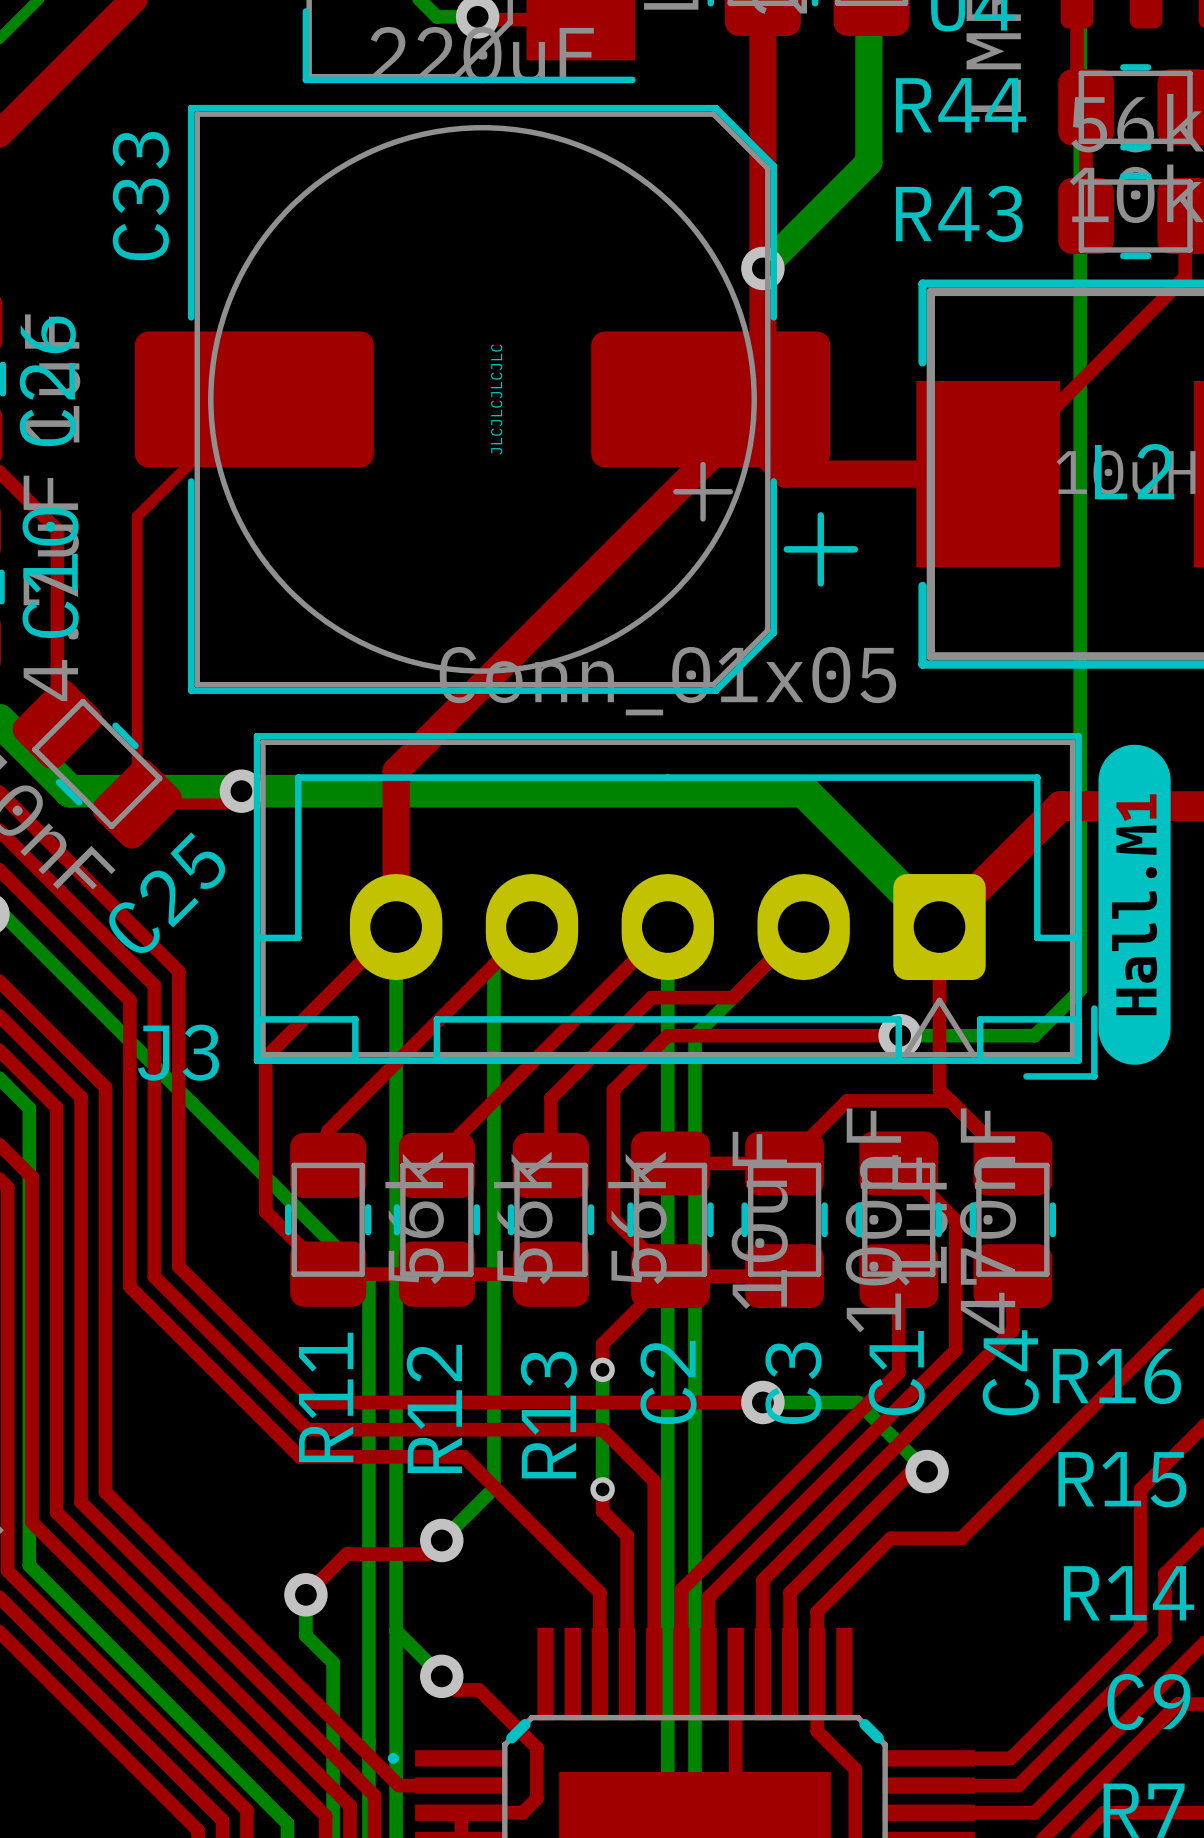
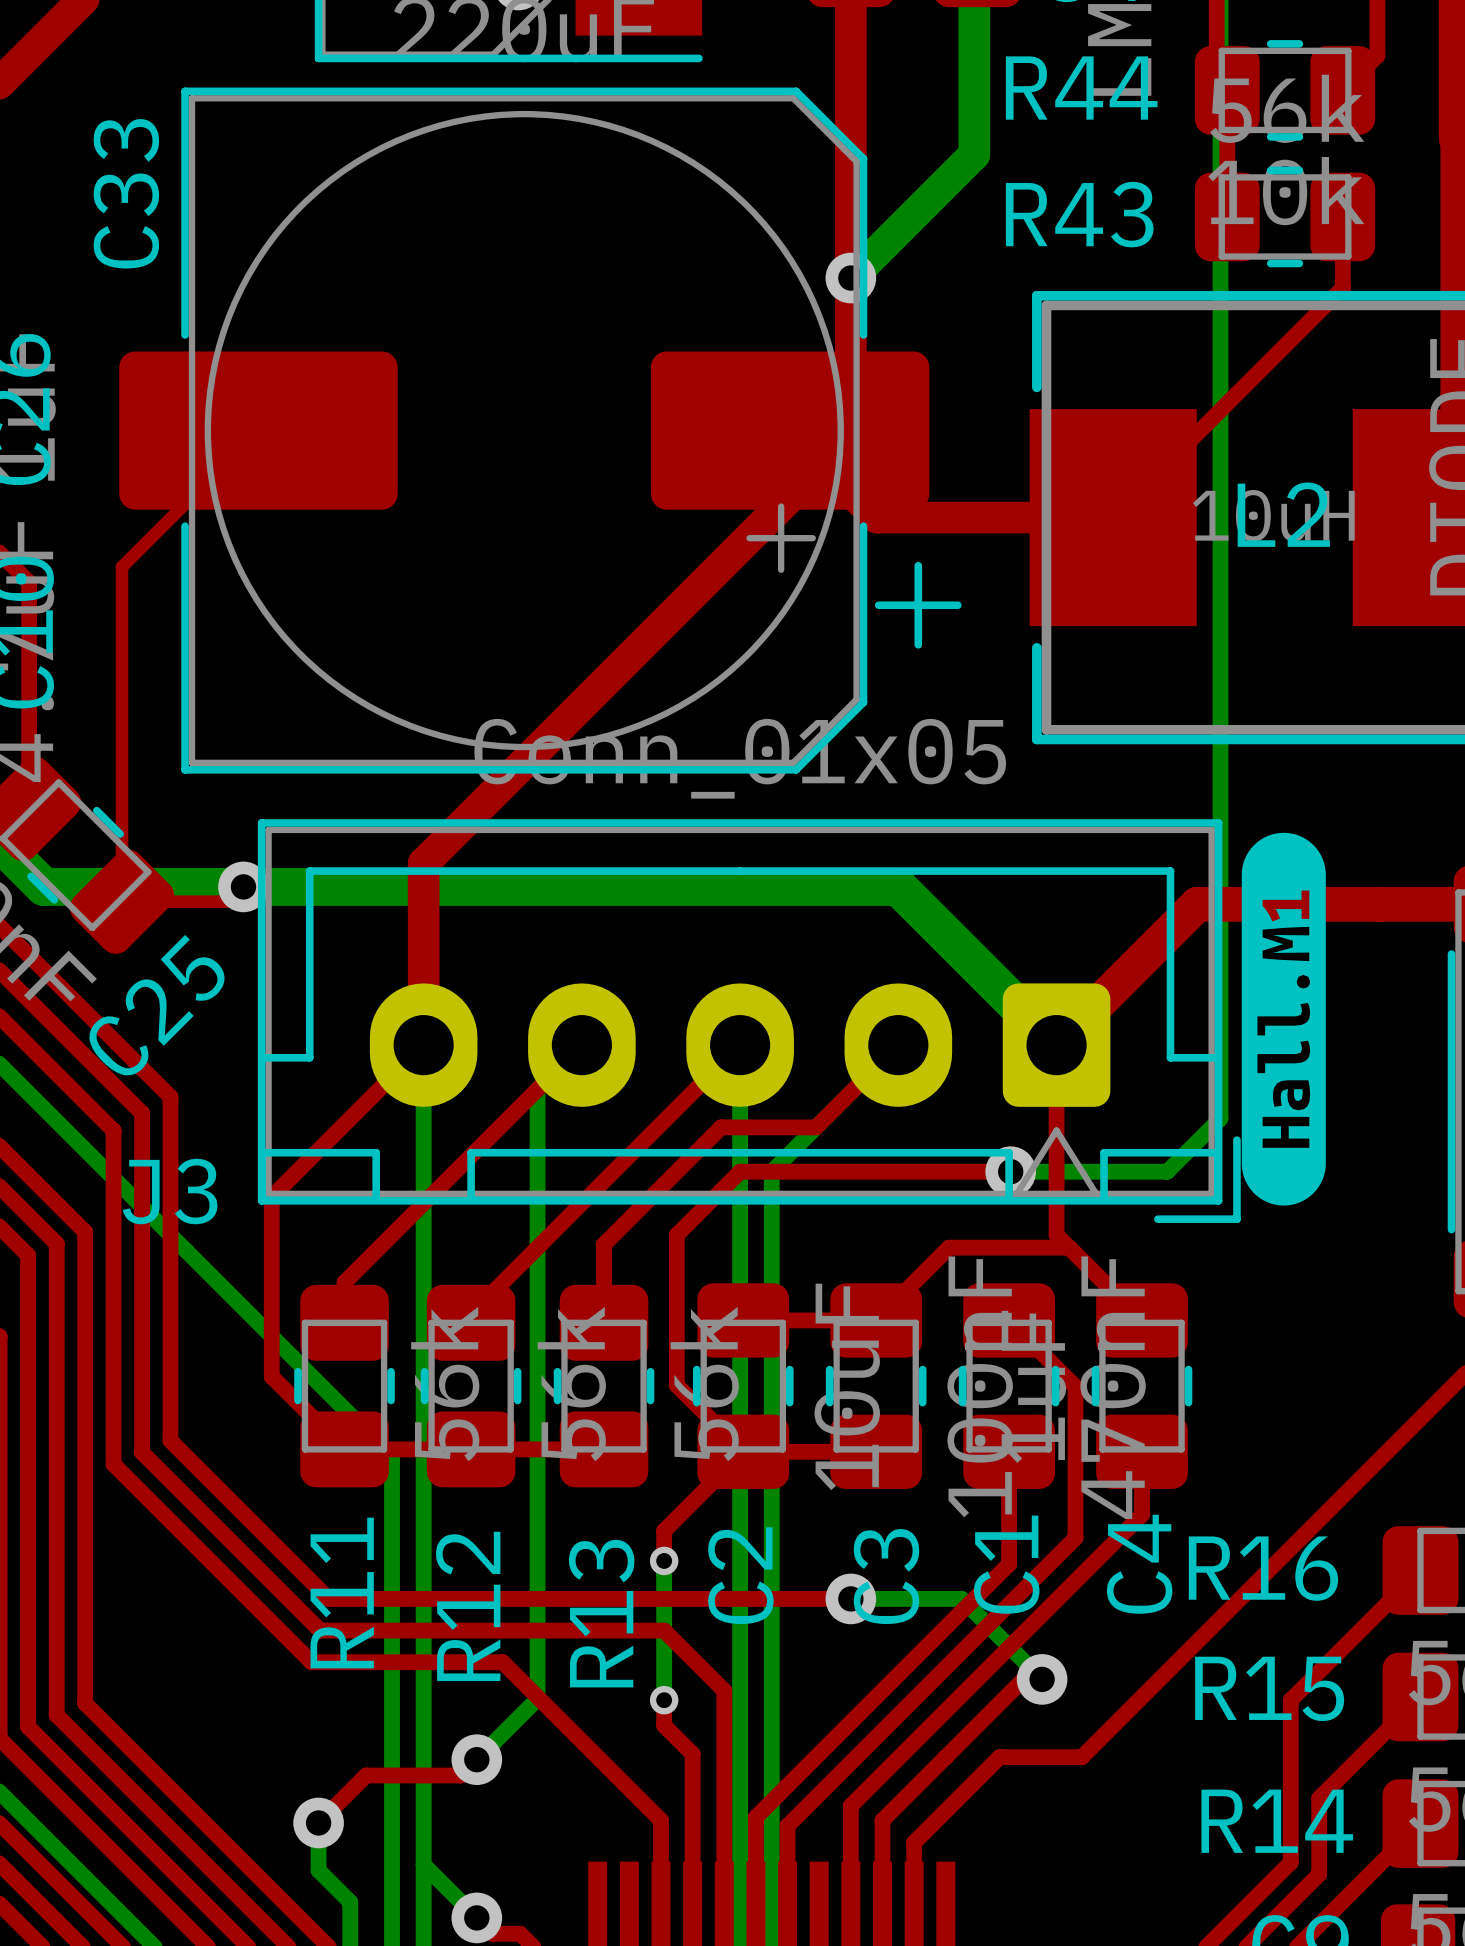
text: JLCJLCJLCJLC (496, 399) -> none

